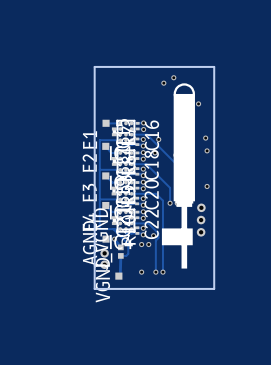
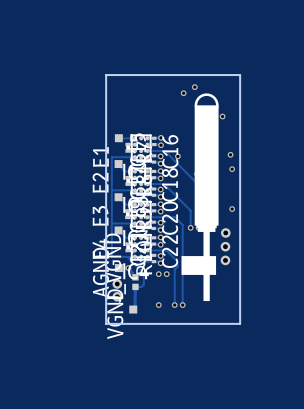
via: (155, 152) -> none
via: (153, 235) -> none

